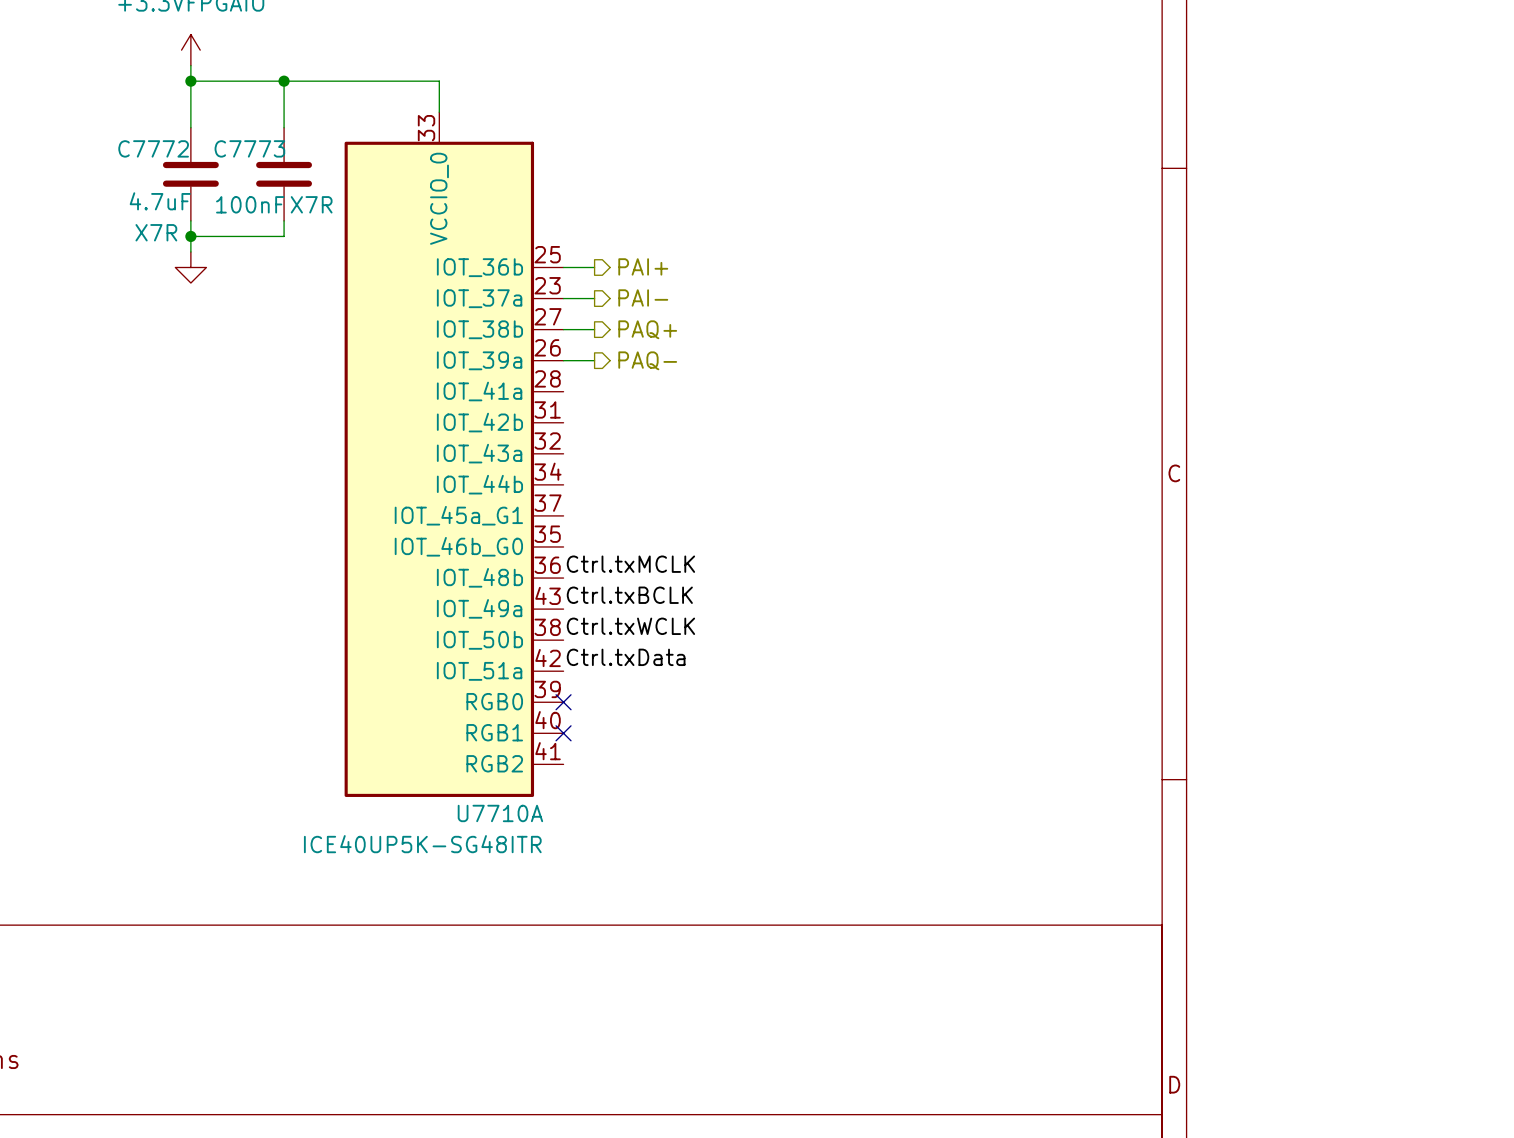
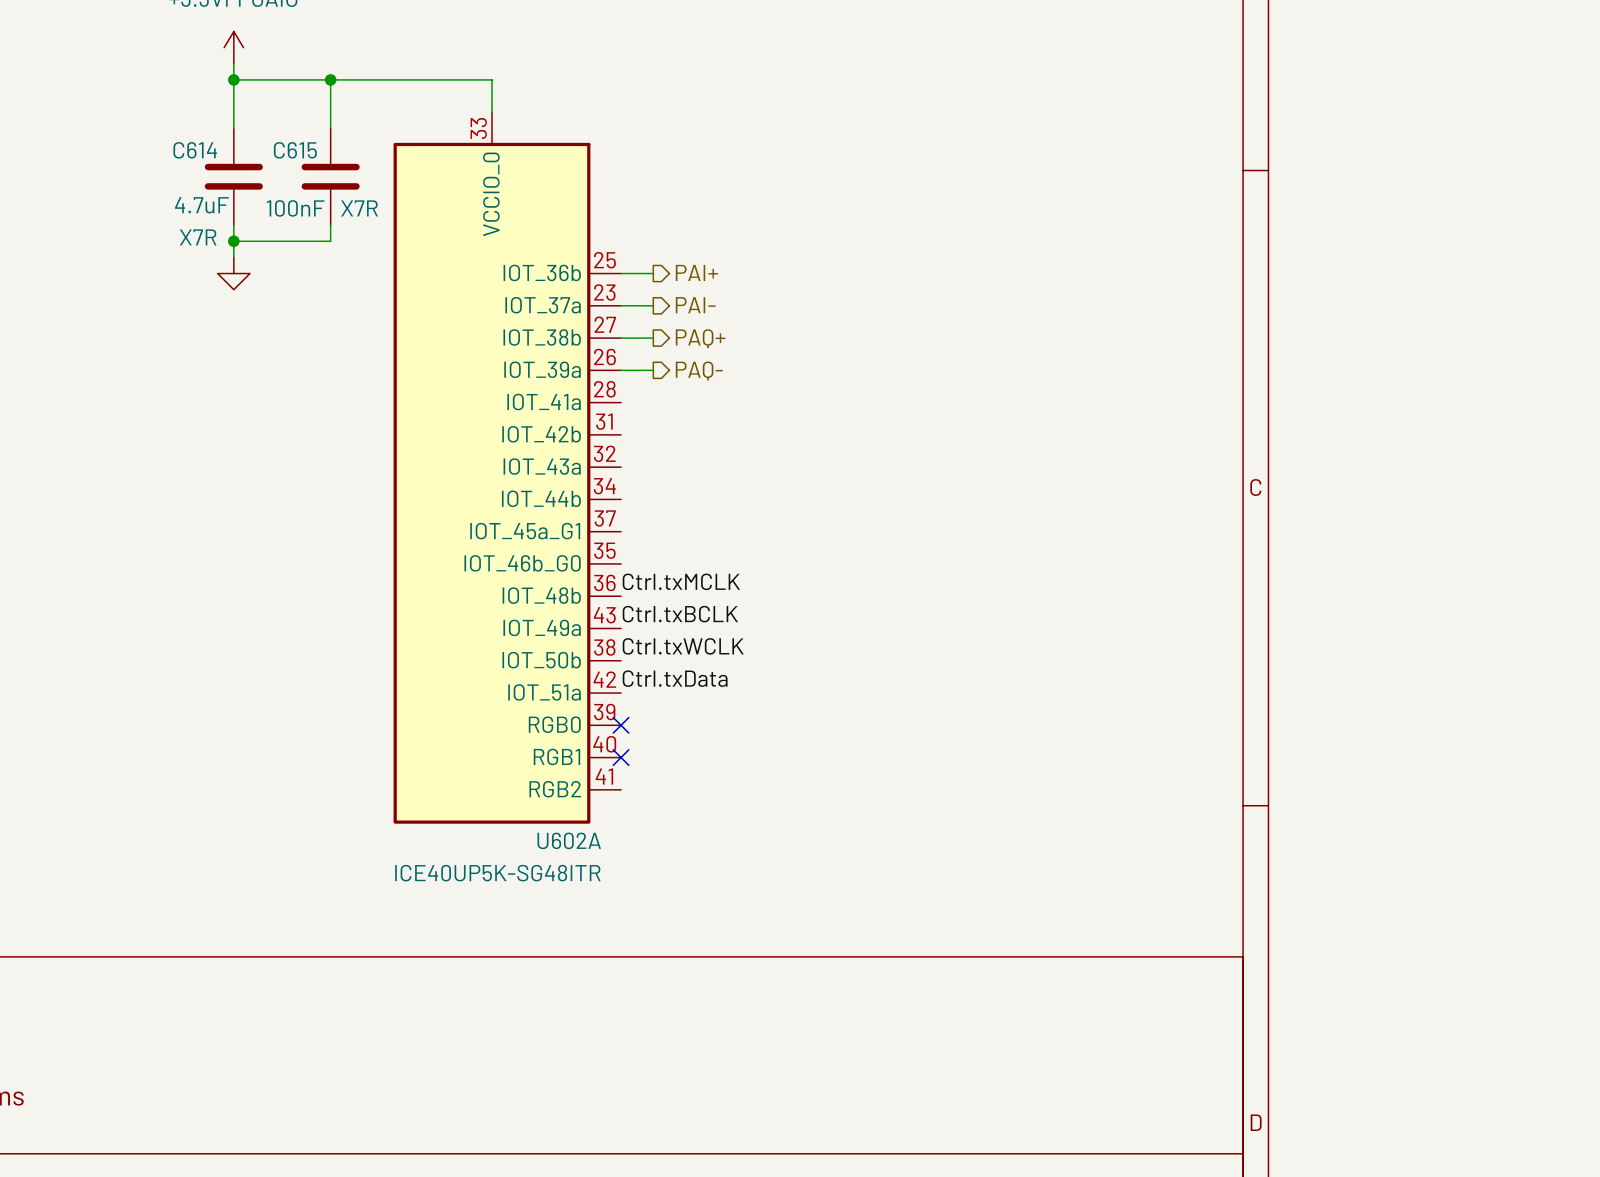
C7772 name: C7772 (153, 148) -> C614 (195, 150)
C7773 name: C7773 (249, 148) -> C615 (295, 150)
U7710A name: U7710A (500, 813) -> U602A (569, 840)

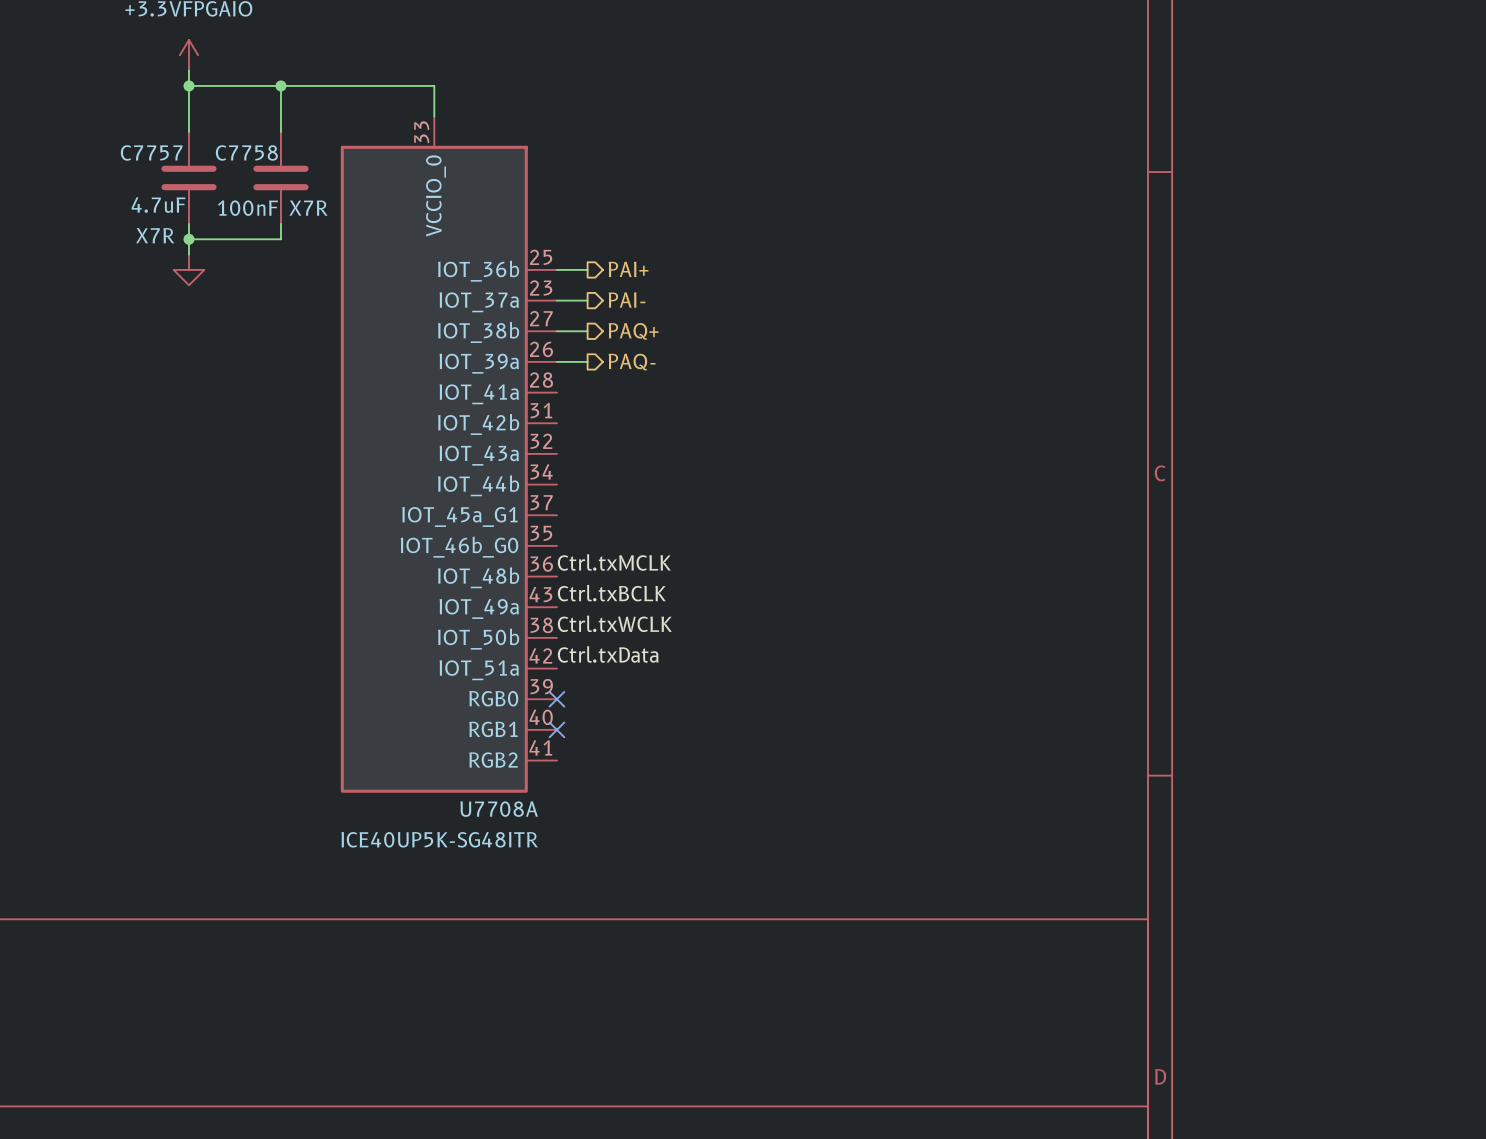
C614 name: C614 (195, 150) -> C7757 (151, 152)
C615 name: C615 (295, 150) -> C7758 (246, 152)
U602A name: U602A (569, 840) -> U7708A (499, 809)

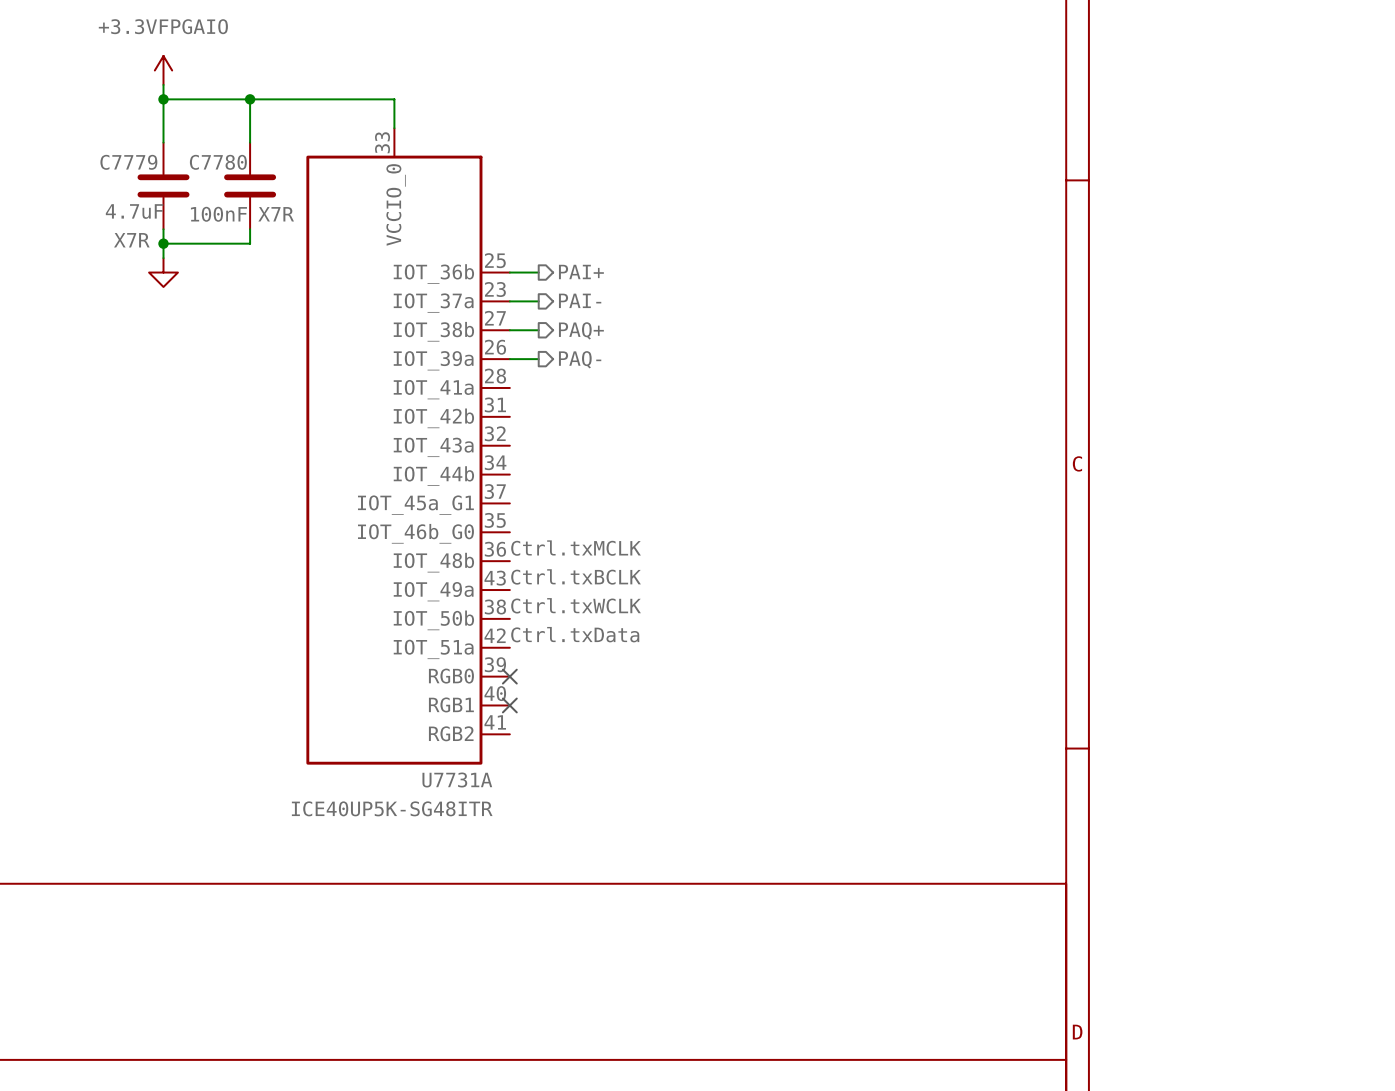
C7757 name: C7757 (151, 152) -> C7779 (128, 162)
C7758 name: C7758 (246, 152) -> C7780 (218, 162)
U7708A name: U7708A (499, 809) -> U7731A (457, 779)

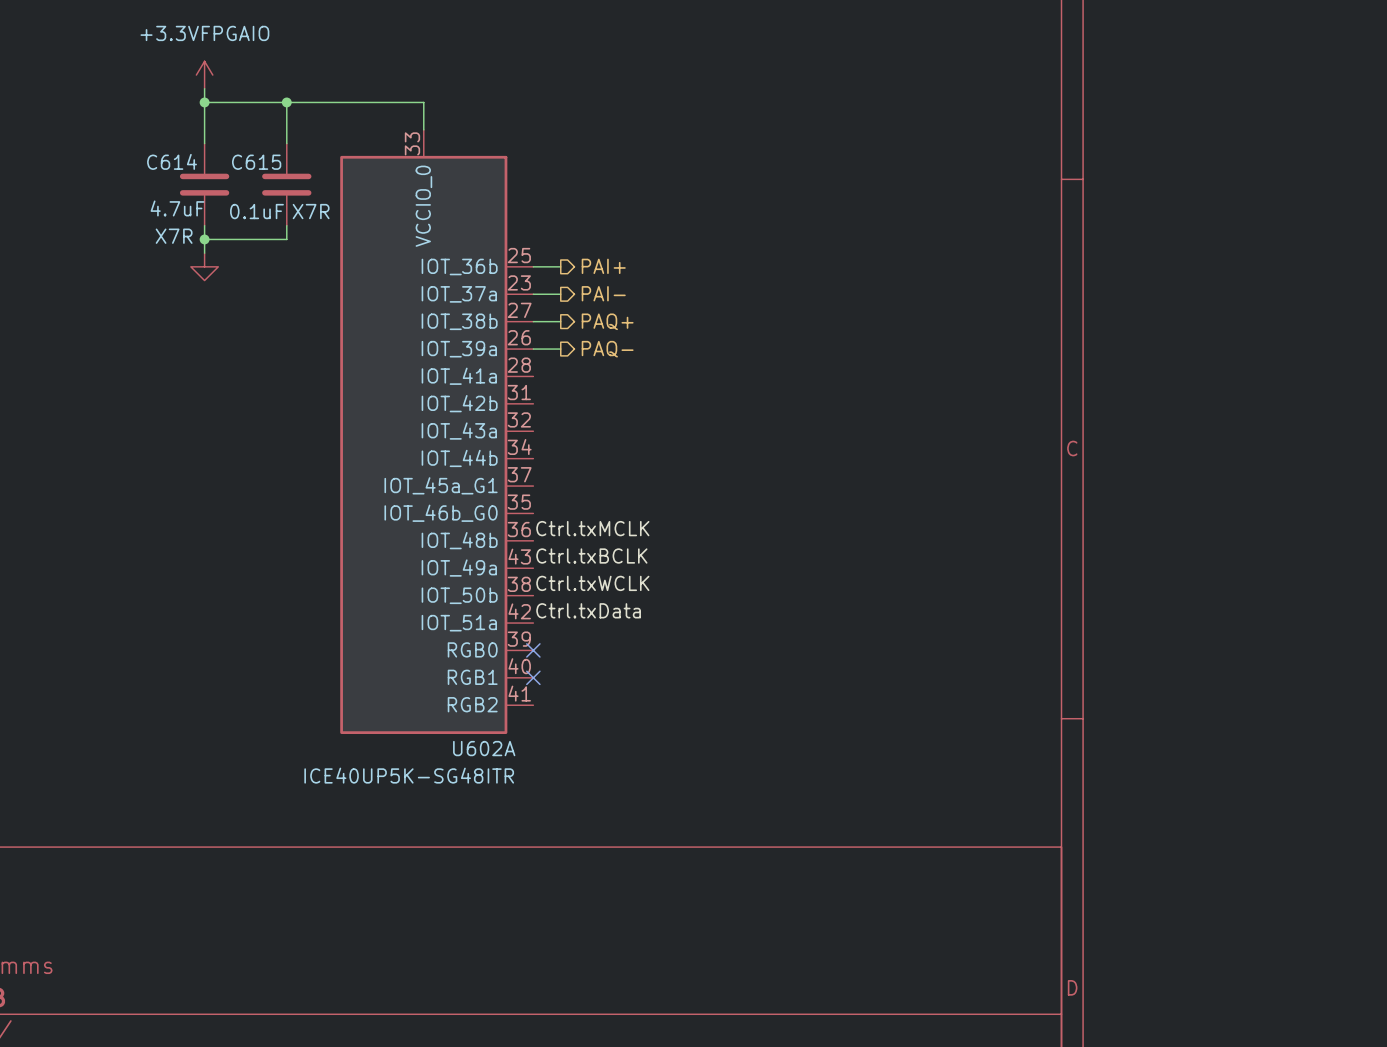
C7779 name: C7779 (128, 162) -> C614 (172, 161)
C7780 name: C7780 (218, 162) -> C615 (256, 162)
C7780 value: 100nF (218, 214) -> 0.1uF (256, 211)
U7731A name: U7731A (457, 779) -> U602A (484, 748)

